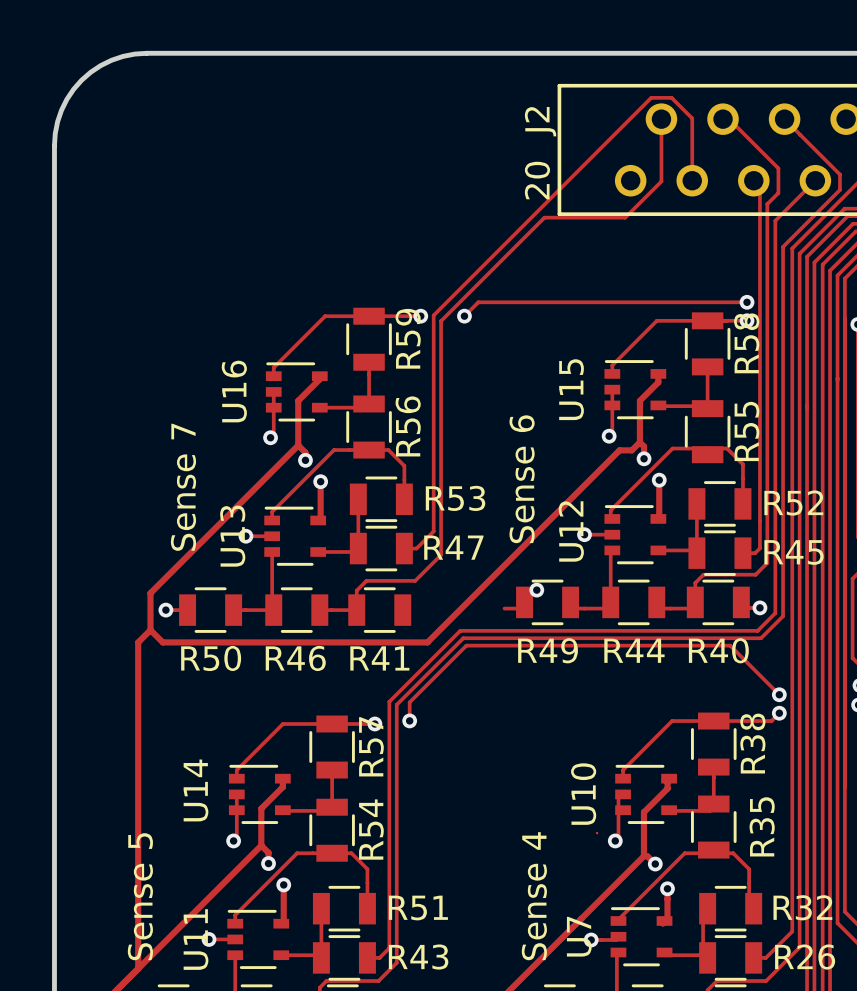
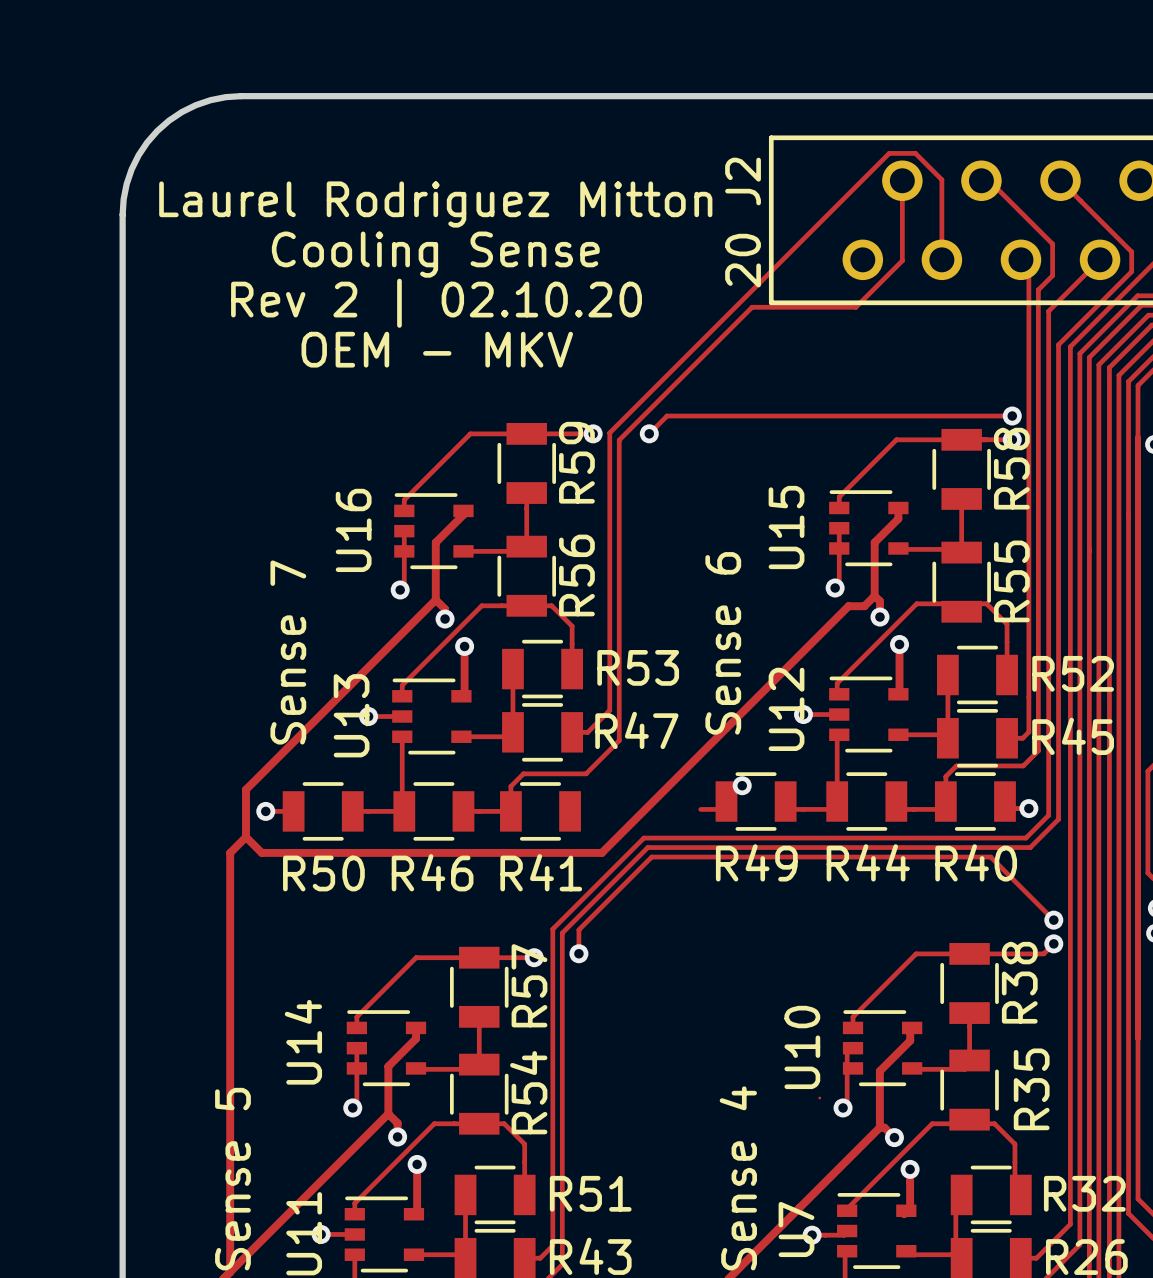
text: none -> Laurel Rodriguez Mitton (435, 204)
text: none -> Cooling Sense (435, 254)
text: none -> Rev 2 | 02.10.20 (436, 303)
text: none -> OEM - MKV (437, 349)

